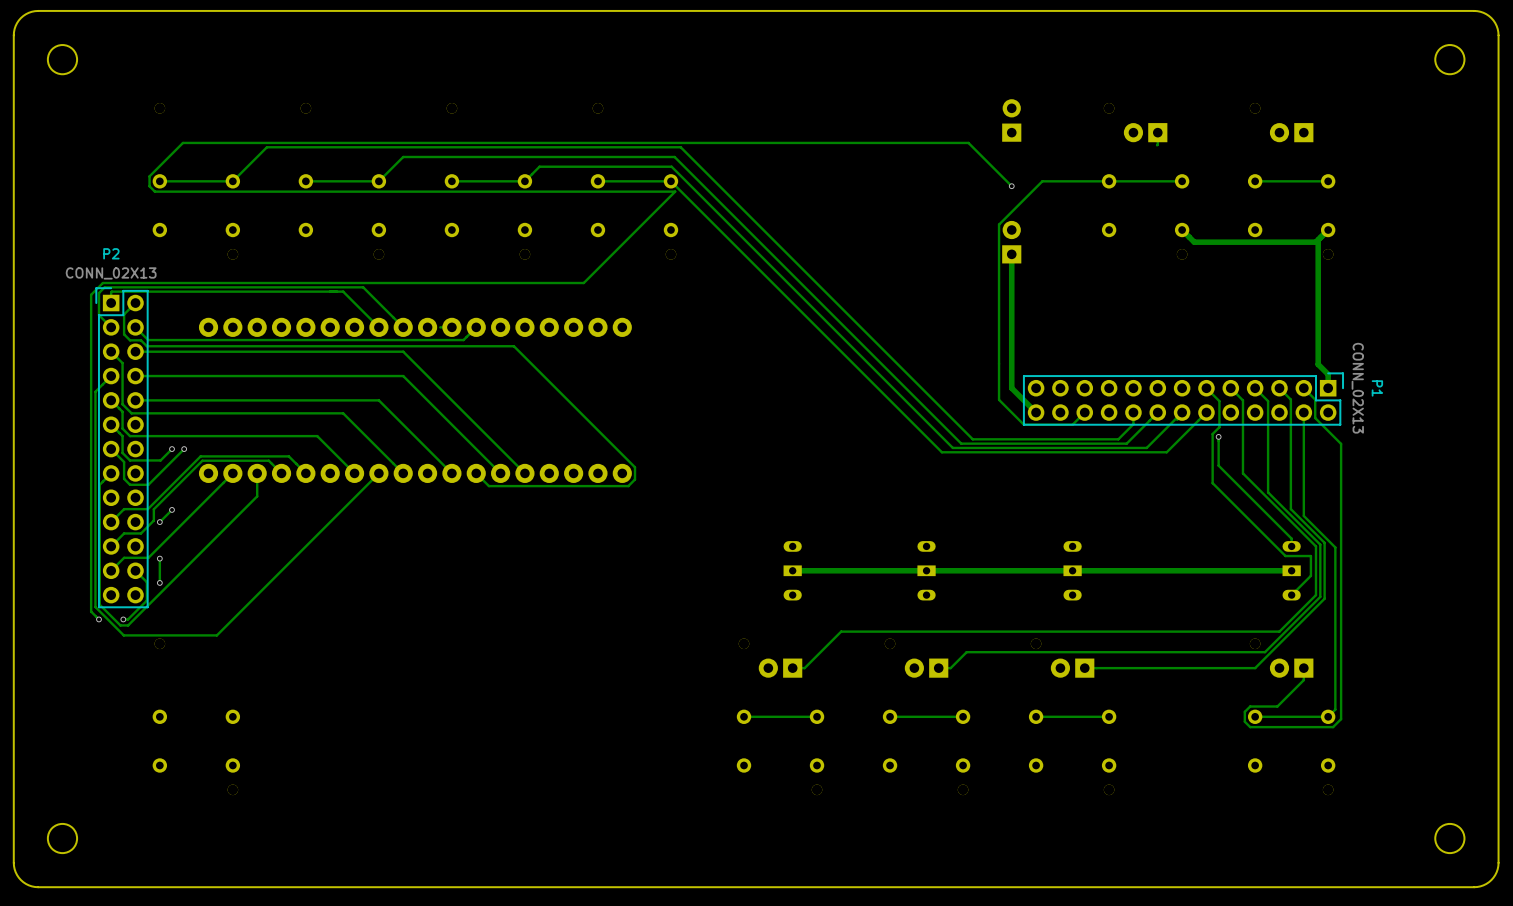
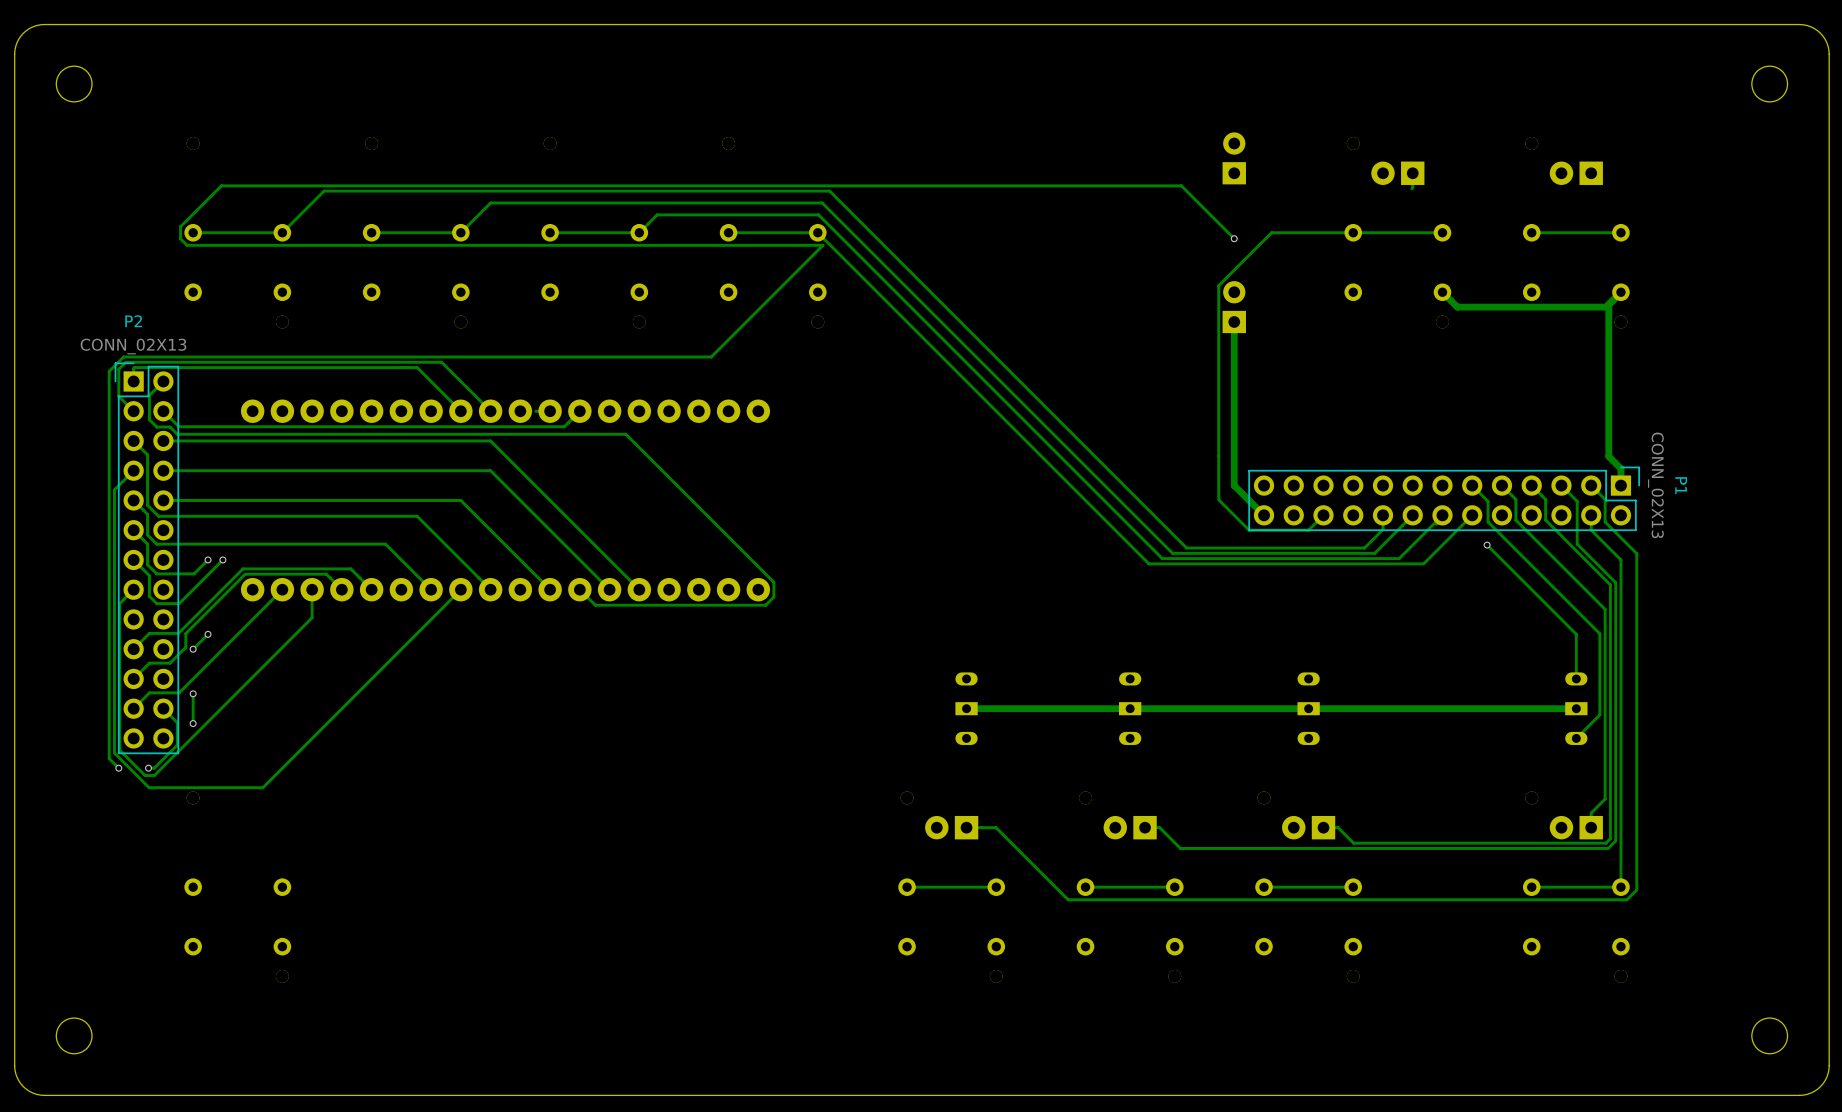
track: (1242, 399) (1242, 473) (1315, 546) (1315, 595) (1279, 631) (841, 631) (804, 668) -> (1525, 899) (1068, 899) (996, 827) (981, 827)
track: (1266, 399) (1268, 401) (1268, 492) (1320, 544) (1320, 596) (1265, 652) (966, 652) (950, 668) -> (1575, 499) (1577, 501) (1577, 544) (1615, 582) (1615, 840) (1608, 848) (1180, 848) (1159, 827)
track: (1290, 399) (1290, 509) -> none
track: (1219, 418) (1219, 427) (1212, 434) (1212, 483) (1285, 556) (1310, 556) -> (1488, 522) (1599, 633) (1599, 690)
track: (1303, 424) (1303, 515) (1335, 547) (1335, 709) (1328, 716) -> (1591, 530) (1620, 559) (1620, 887)
track: (1218, 436) (1218, 465) (1291, 538) -> (1487, 545) (1575, 633)
track: (1291, 509) (1324, 542) (1324, 598) (1255, 668) (1096, 668) -> (1545, 499) (1545, 520) (1610, 584) (1610, 838) (1605, 843) (1353, 843) (1338, 827)
track: none -> (1576, 634) (1576, 669)
track: (1303, 668) (1303, 680) (1277, 706) (1250, 706) (1244, 711) (1244, 721) (1250, 727) -> (1591, 827) (1591, 813) (1605, 799) (1605, 609) (1515, 520) (1515, 499)

